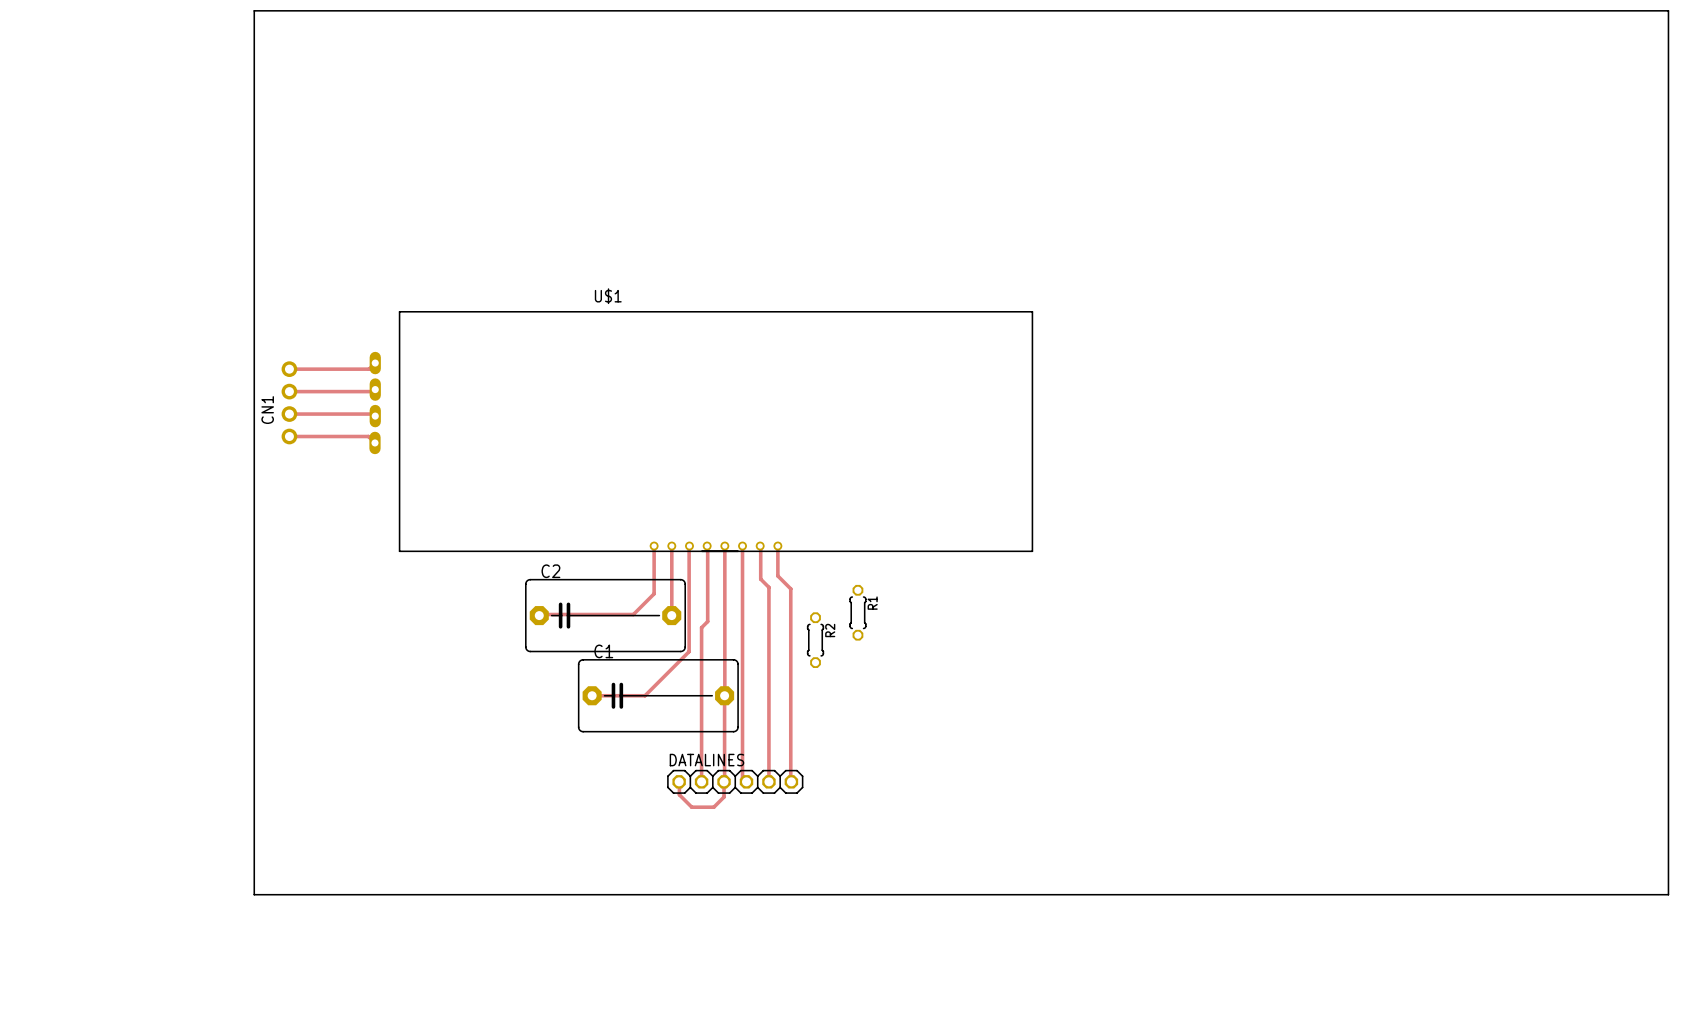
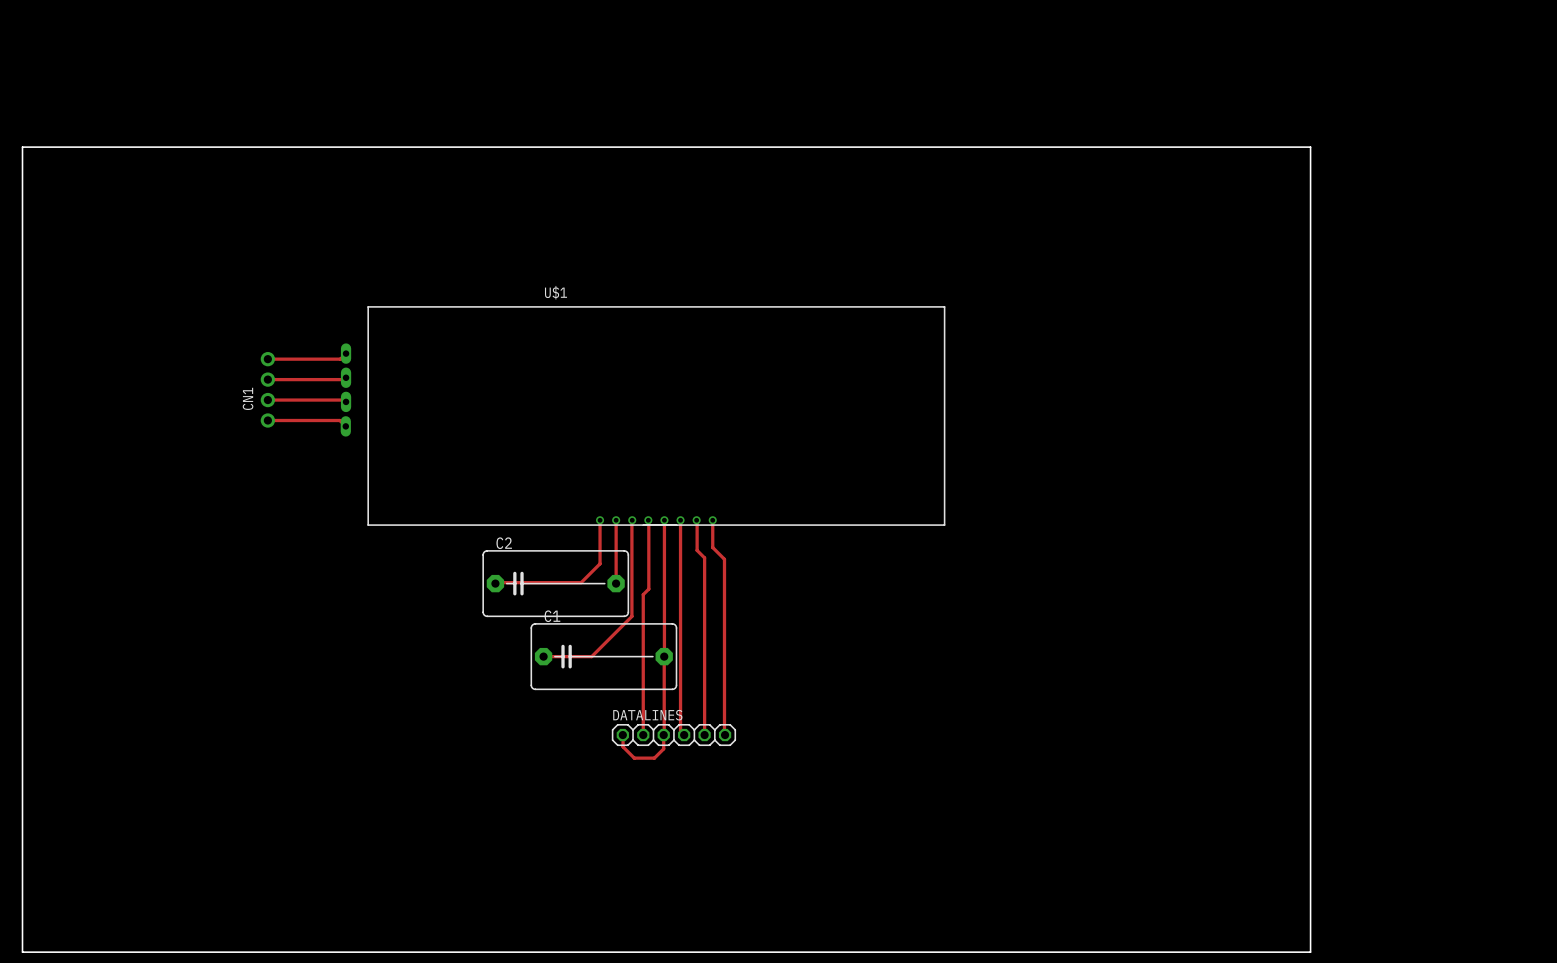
board edge: (254, 10) (1668, 10) (1668, 894) (254, 894) (254, 10) -> (22, 147) (22, 952) (1310, 952) (1310, 147) (22, 147)
R1: (857, 612) -> none
R2: (815, 640) -> none

